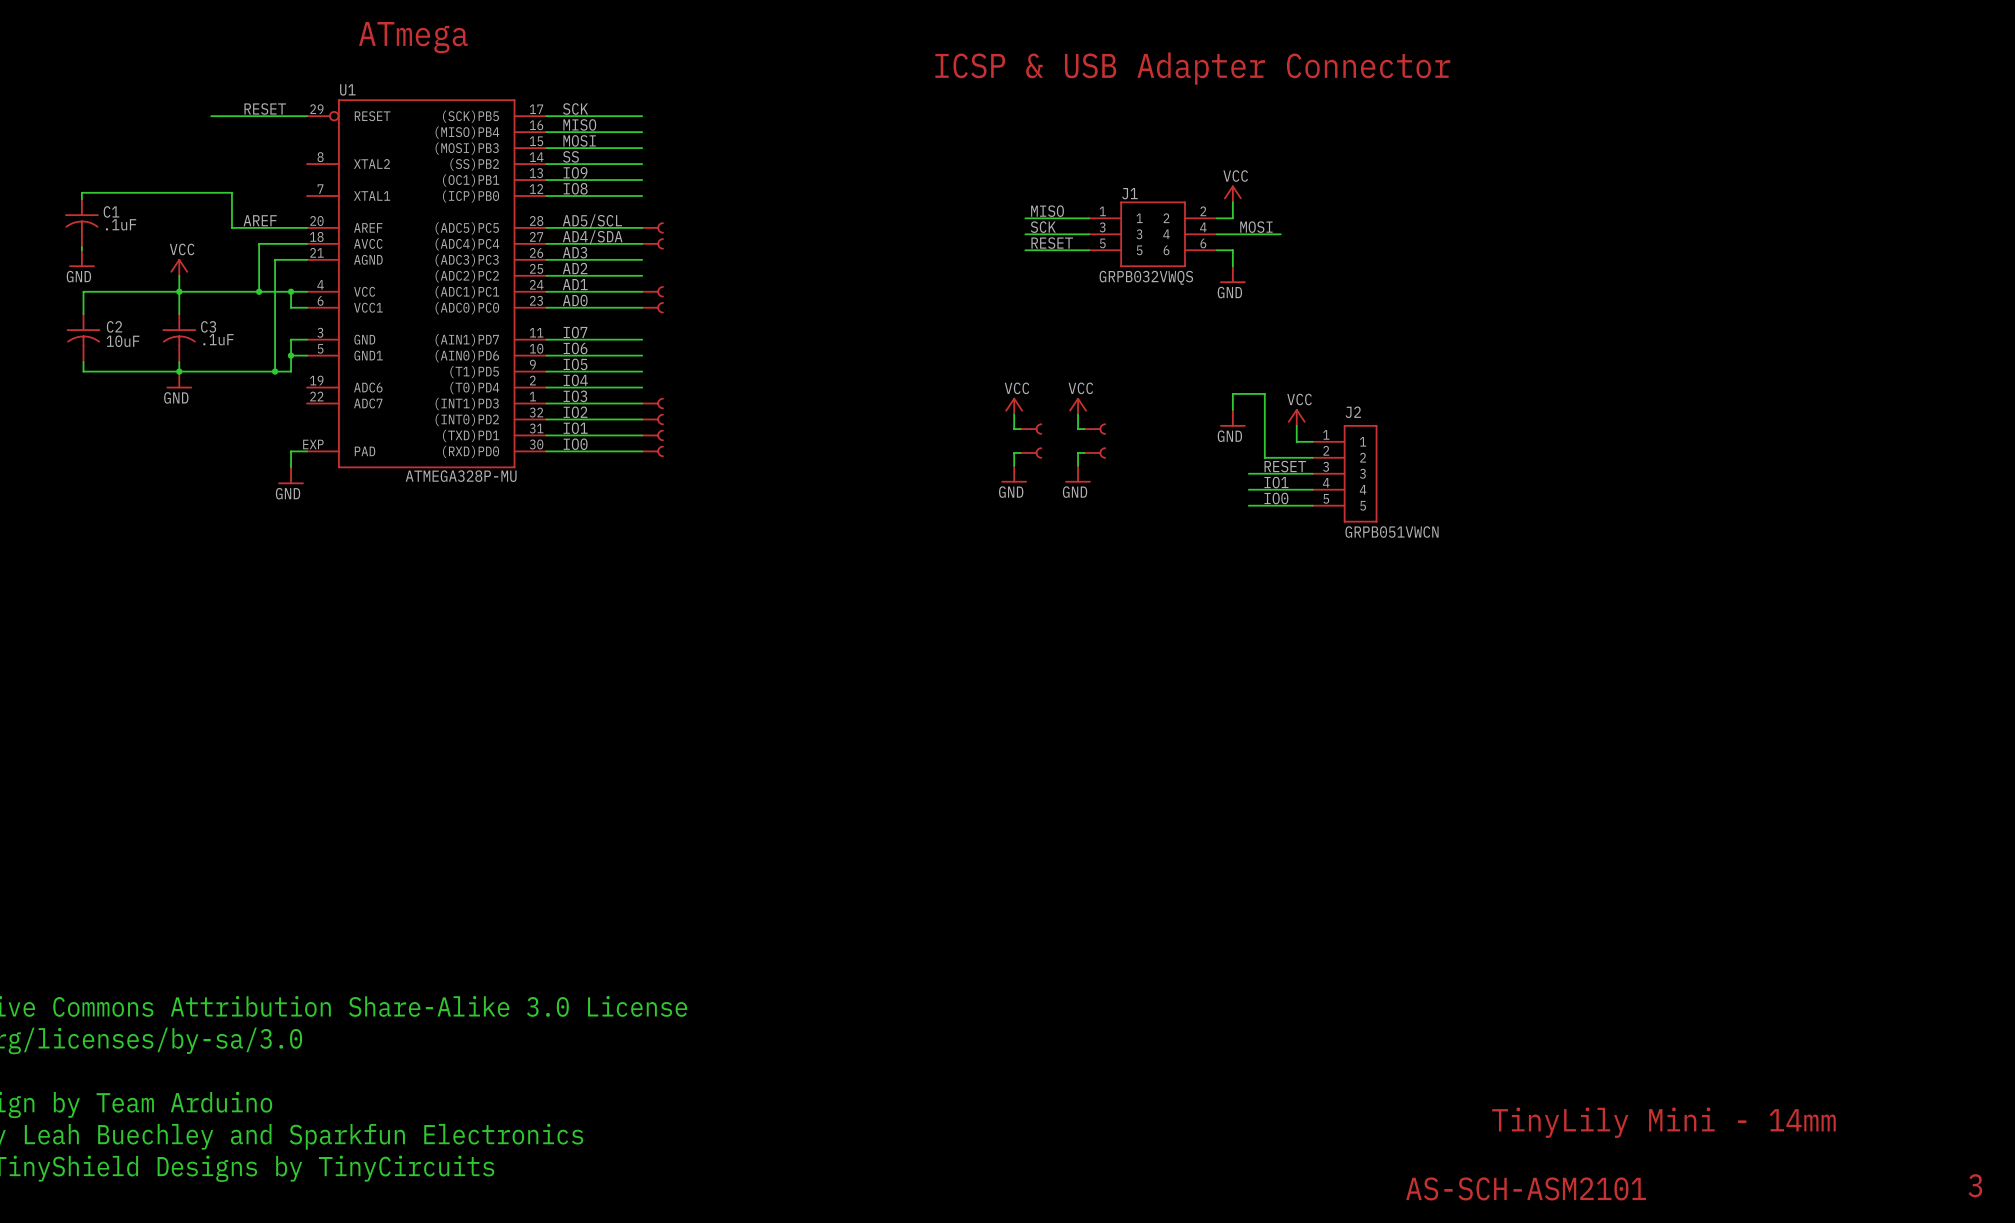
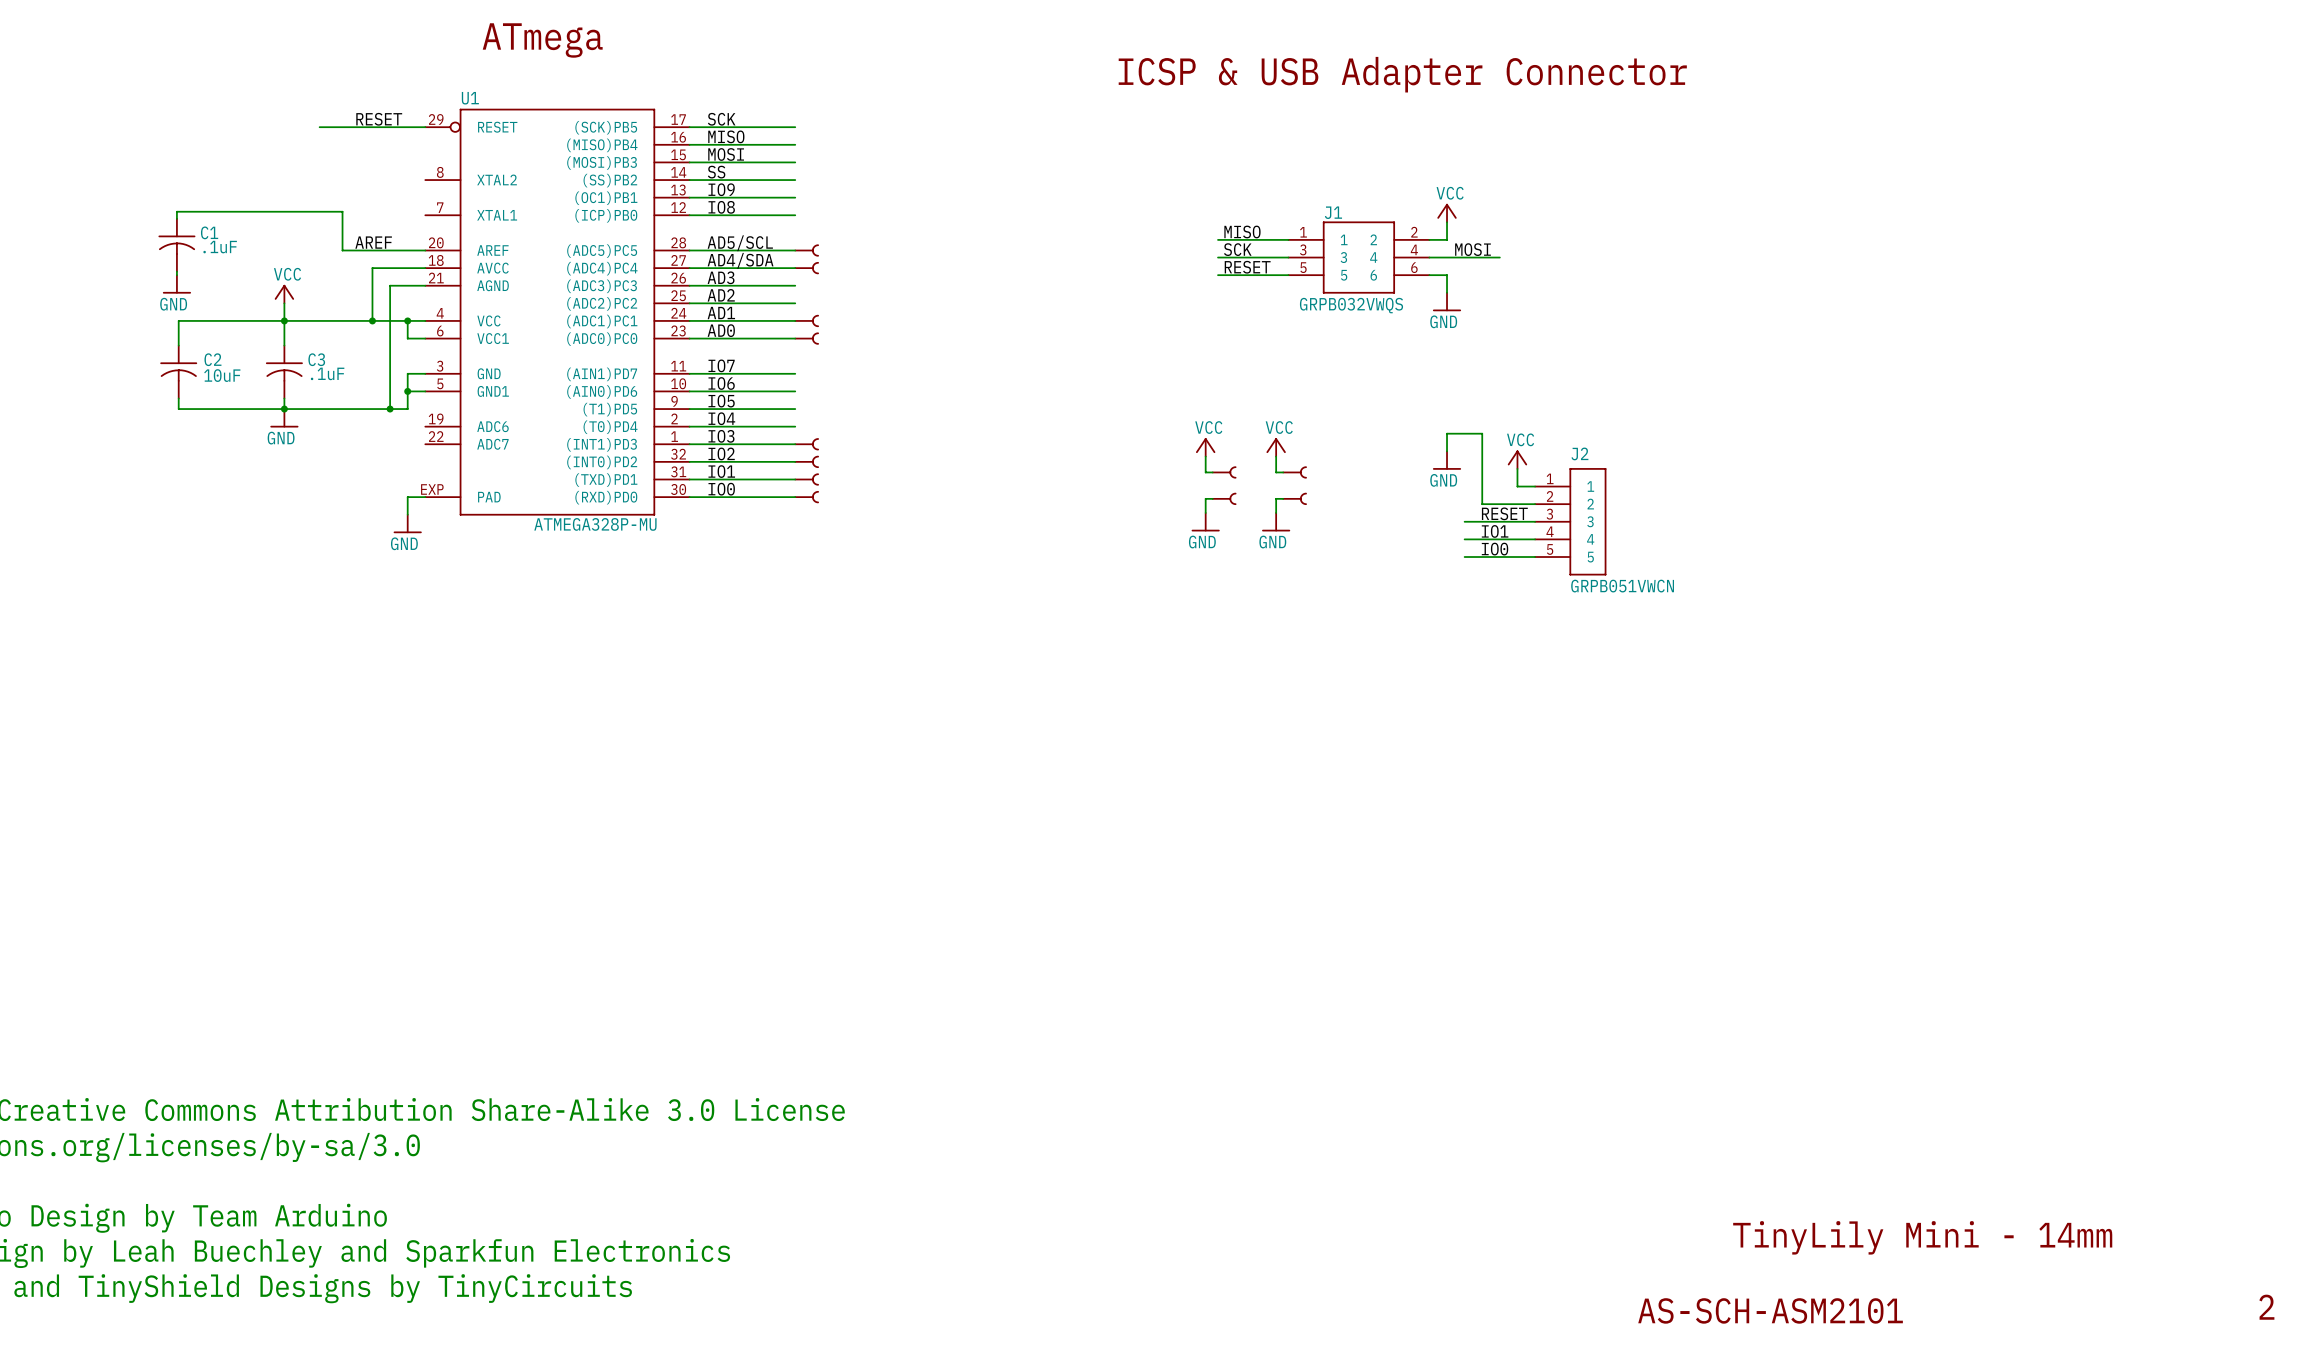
text: 3 (1975, 1185) -> 2 (2266, 1307)

